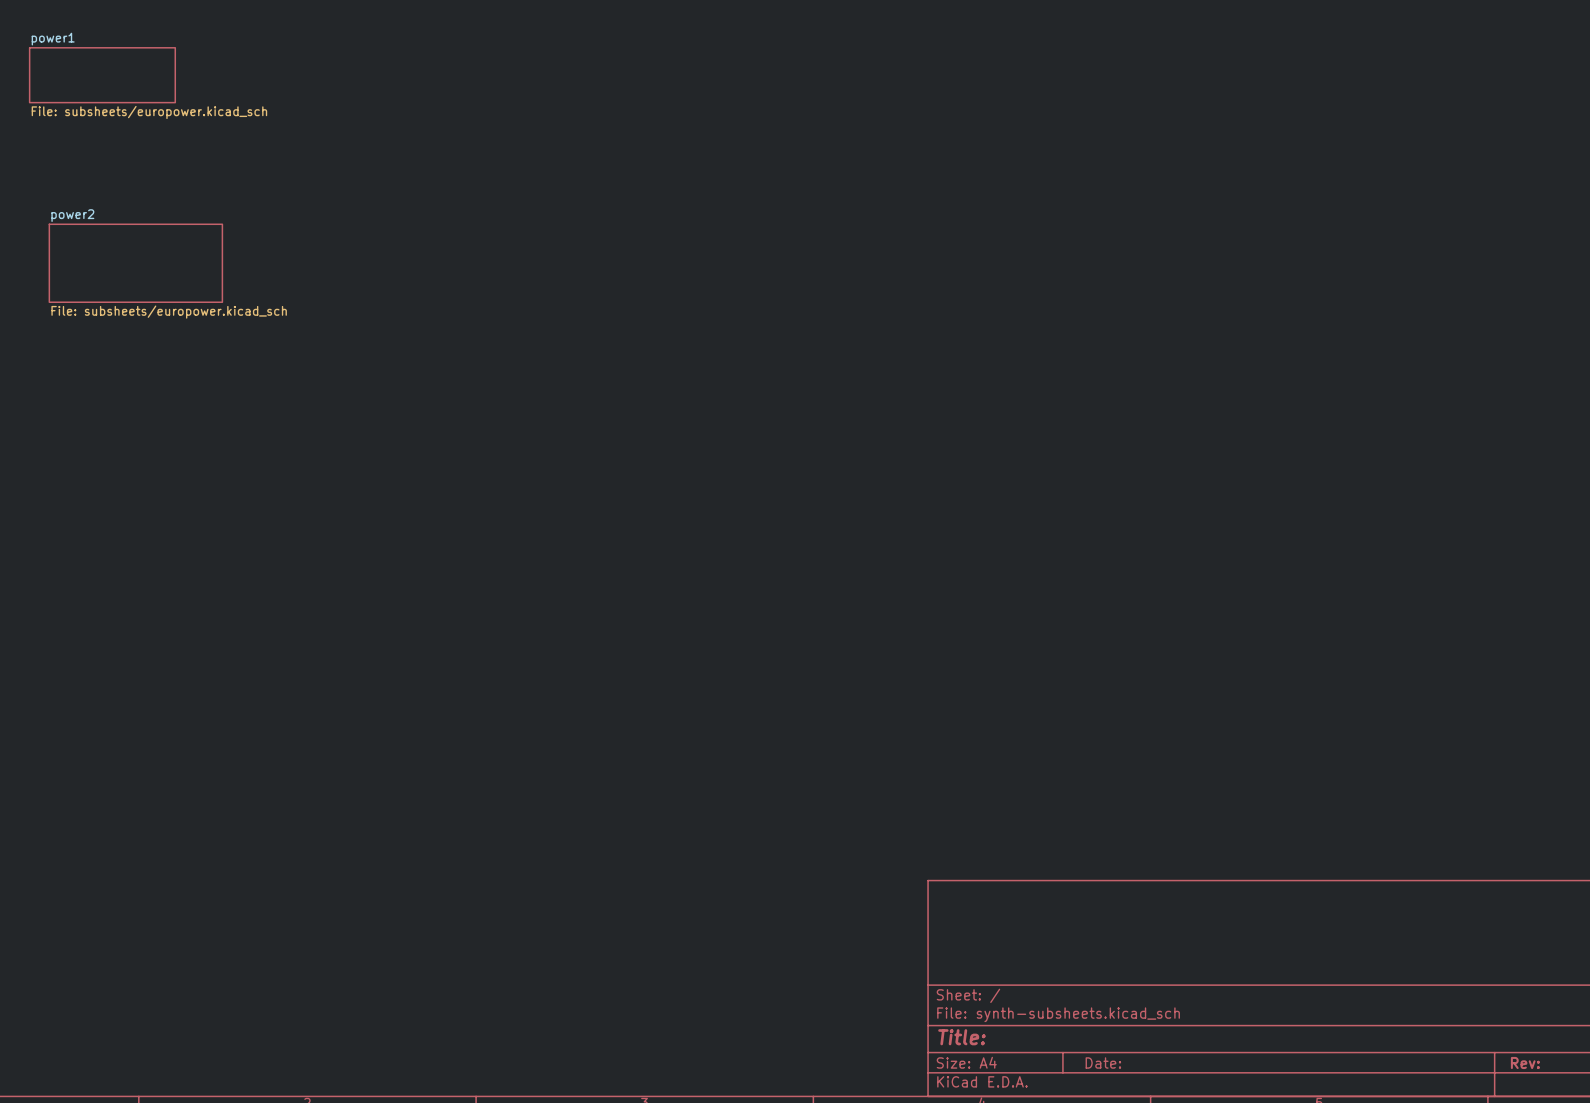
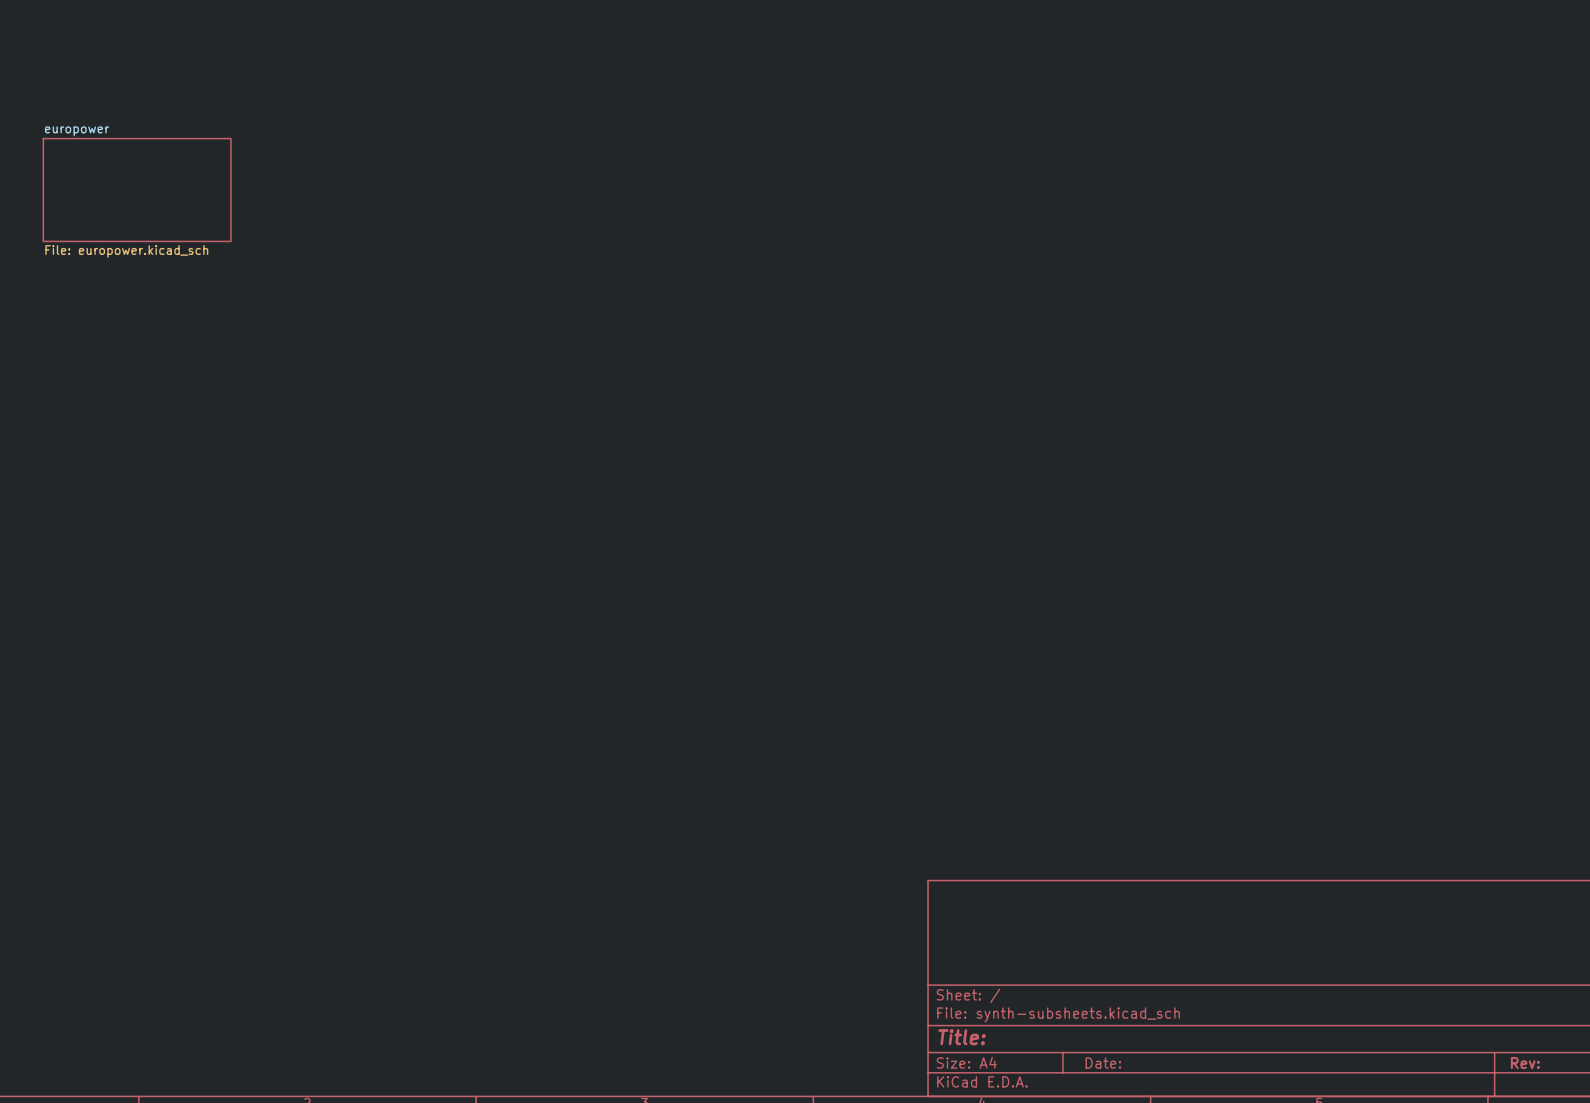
sheet power1: File: subsheets/europower.kicad_sch (102, 75) -> none
sheet europower: none -> File: europower.kicad_sch (137, 190)
sheet power2: File: subsheets/europower.kicad_sch (135, 263) -> none

